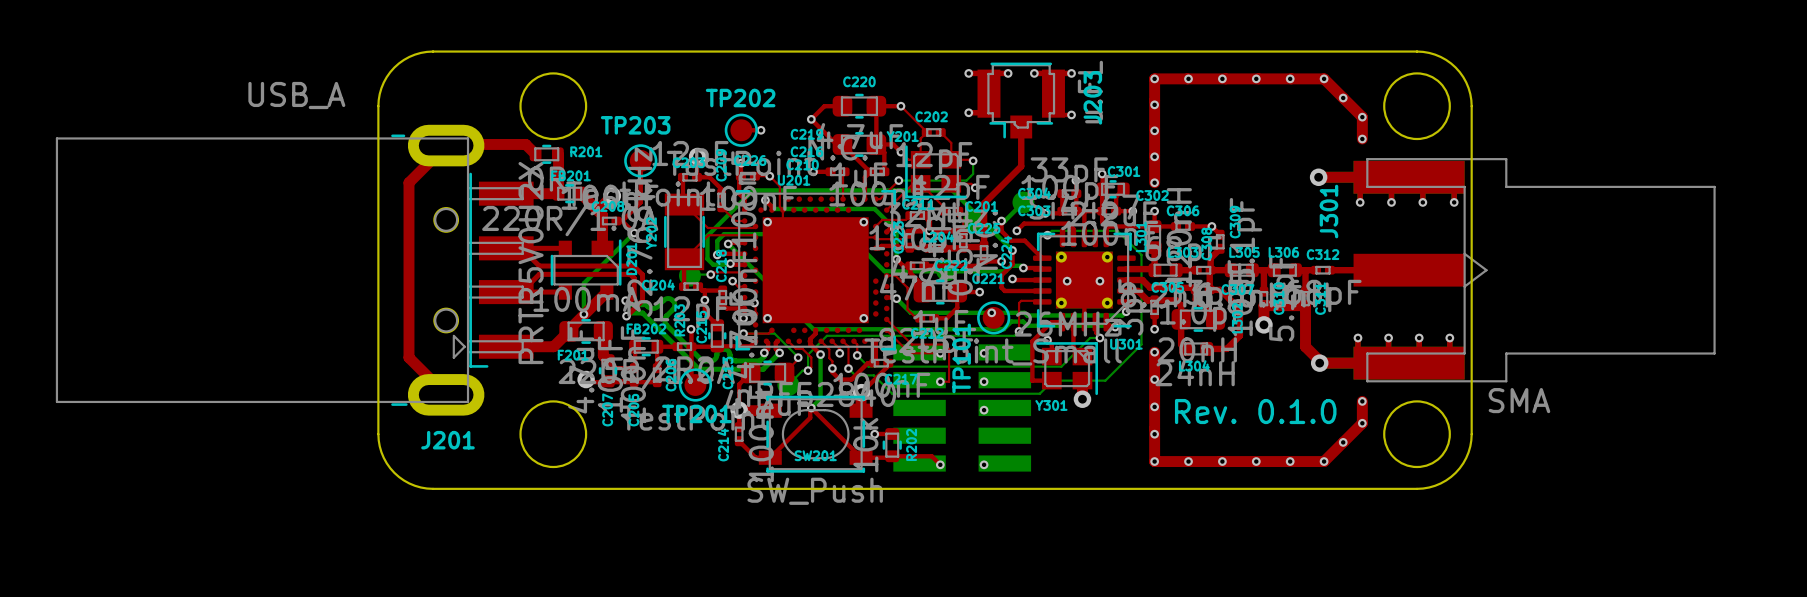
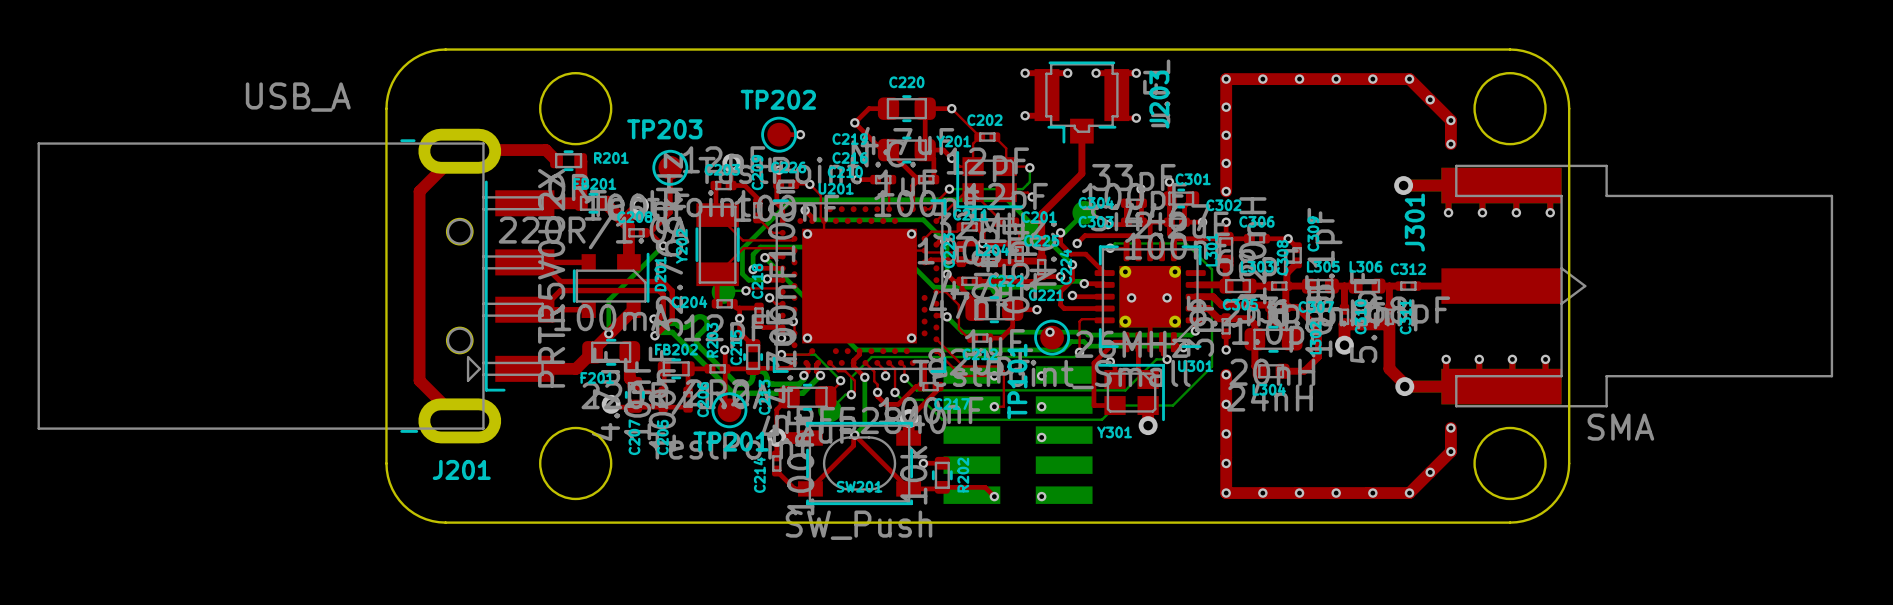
text: Rev. 0.1.0 (1255, 411) -> none

